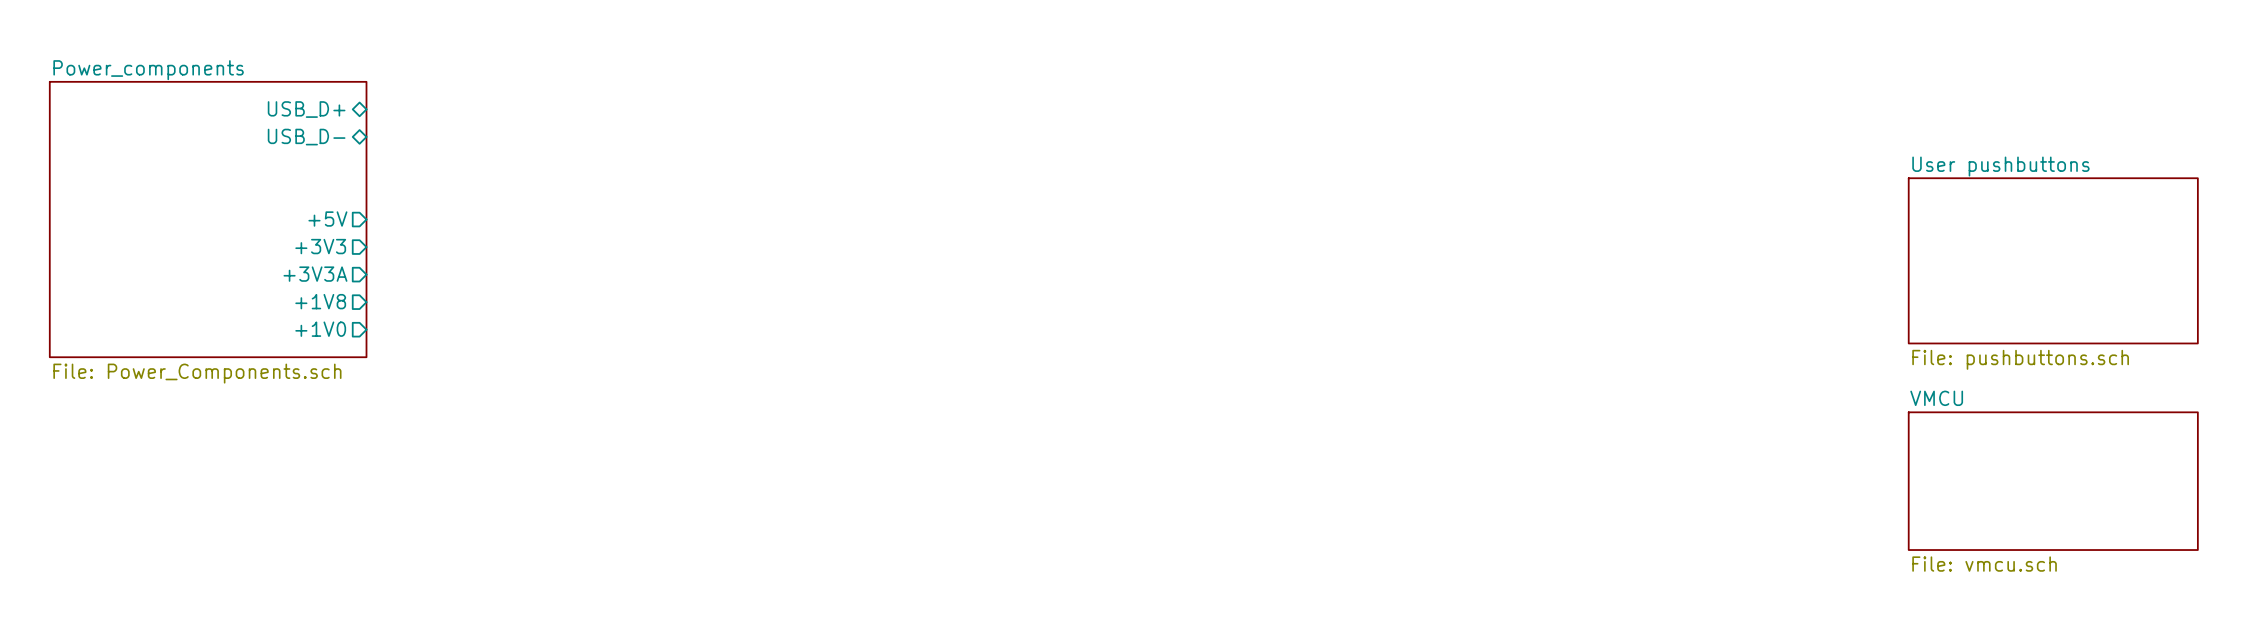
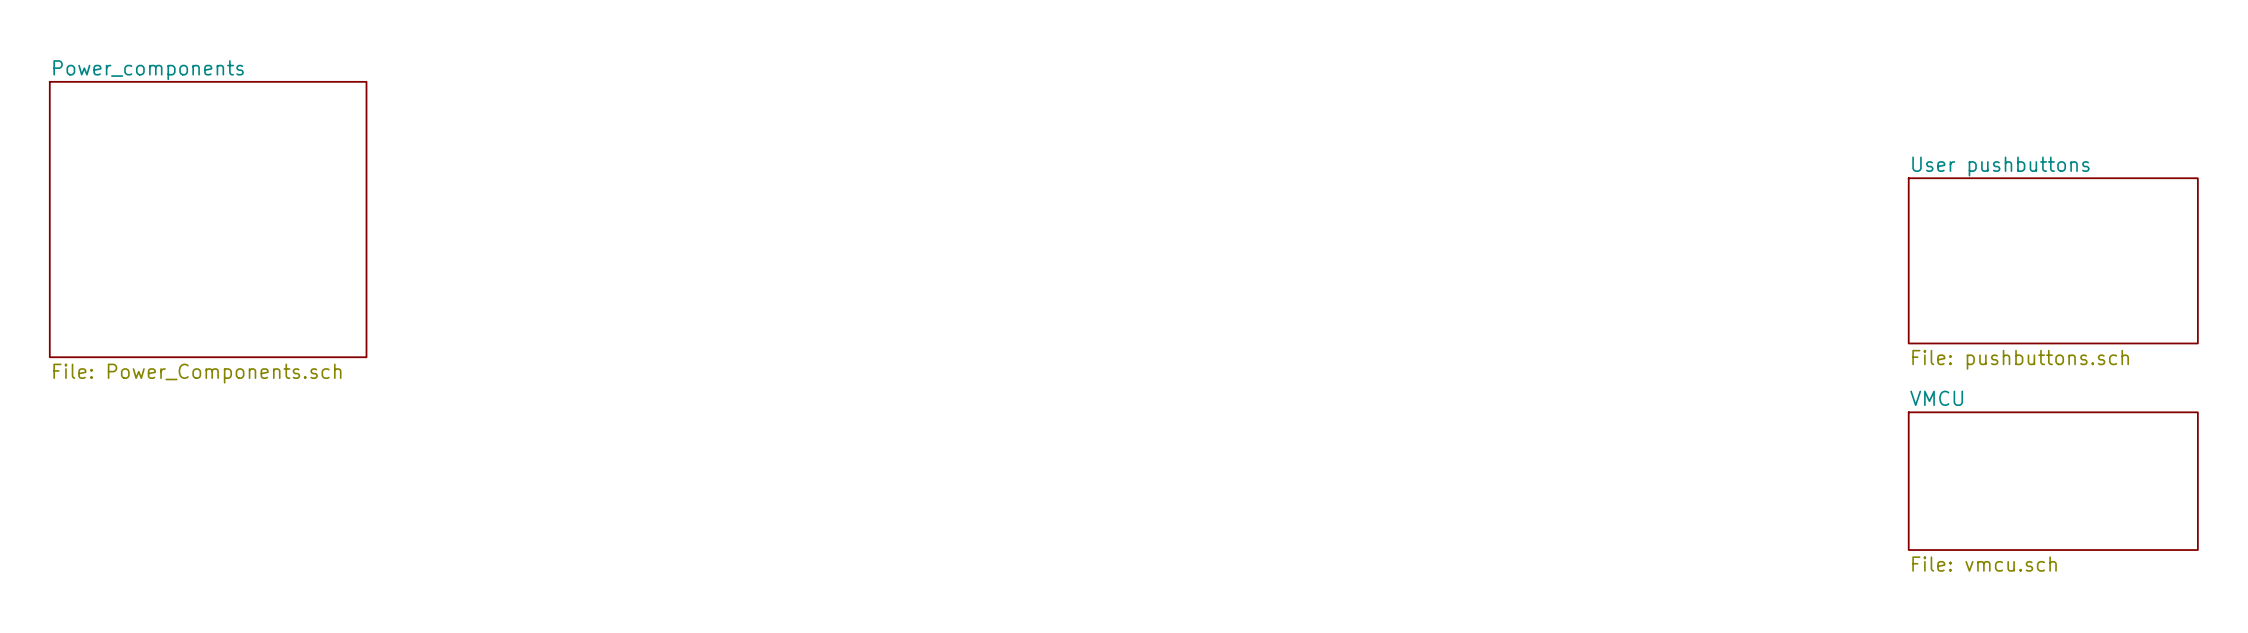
sheet pin: USB_D+ (306, 109) -> none
sheet pin: USB_D- (306, 137) -> none
sheet pin: +5V (327, 219) -> none
sheet pin: +3V3 (320, 246) -> none
sheet pin: +3V3A (315, 274) -> none
sheet pin: +1V8 (320, 301) -> none
sheet pin: +1V0 (320, 329) -> none

